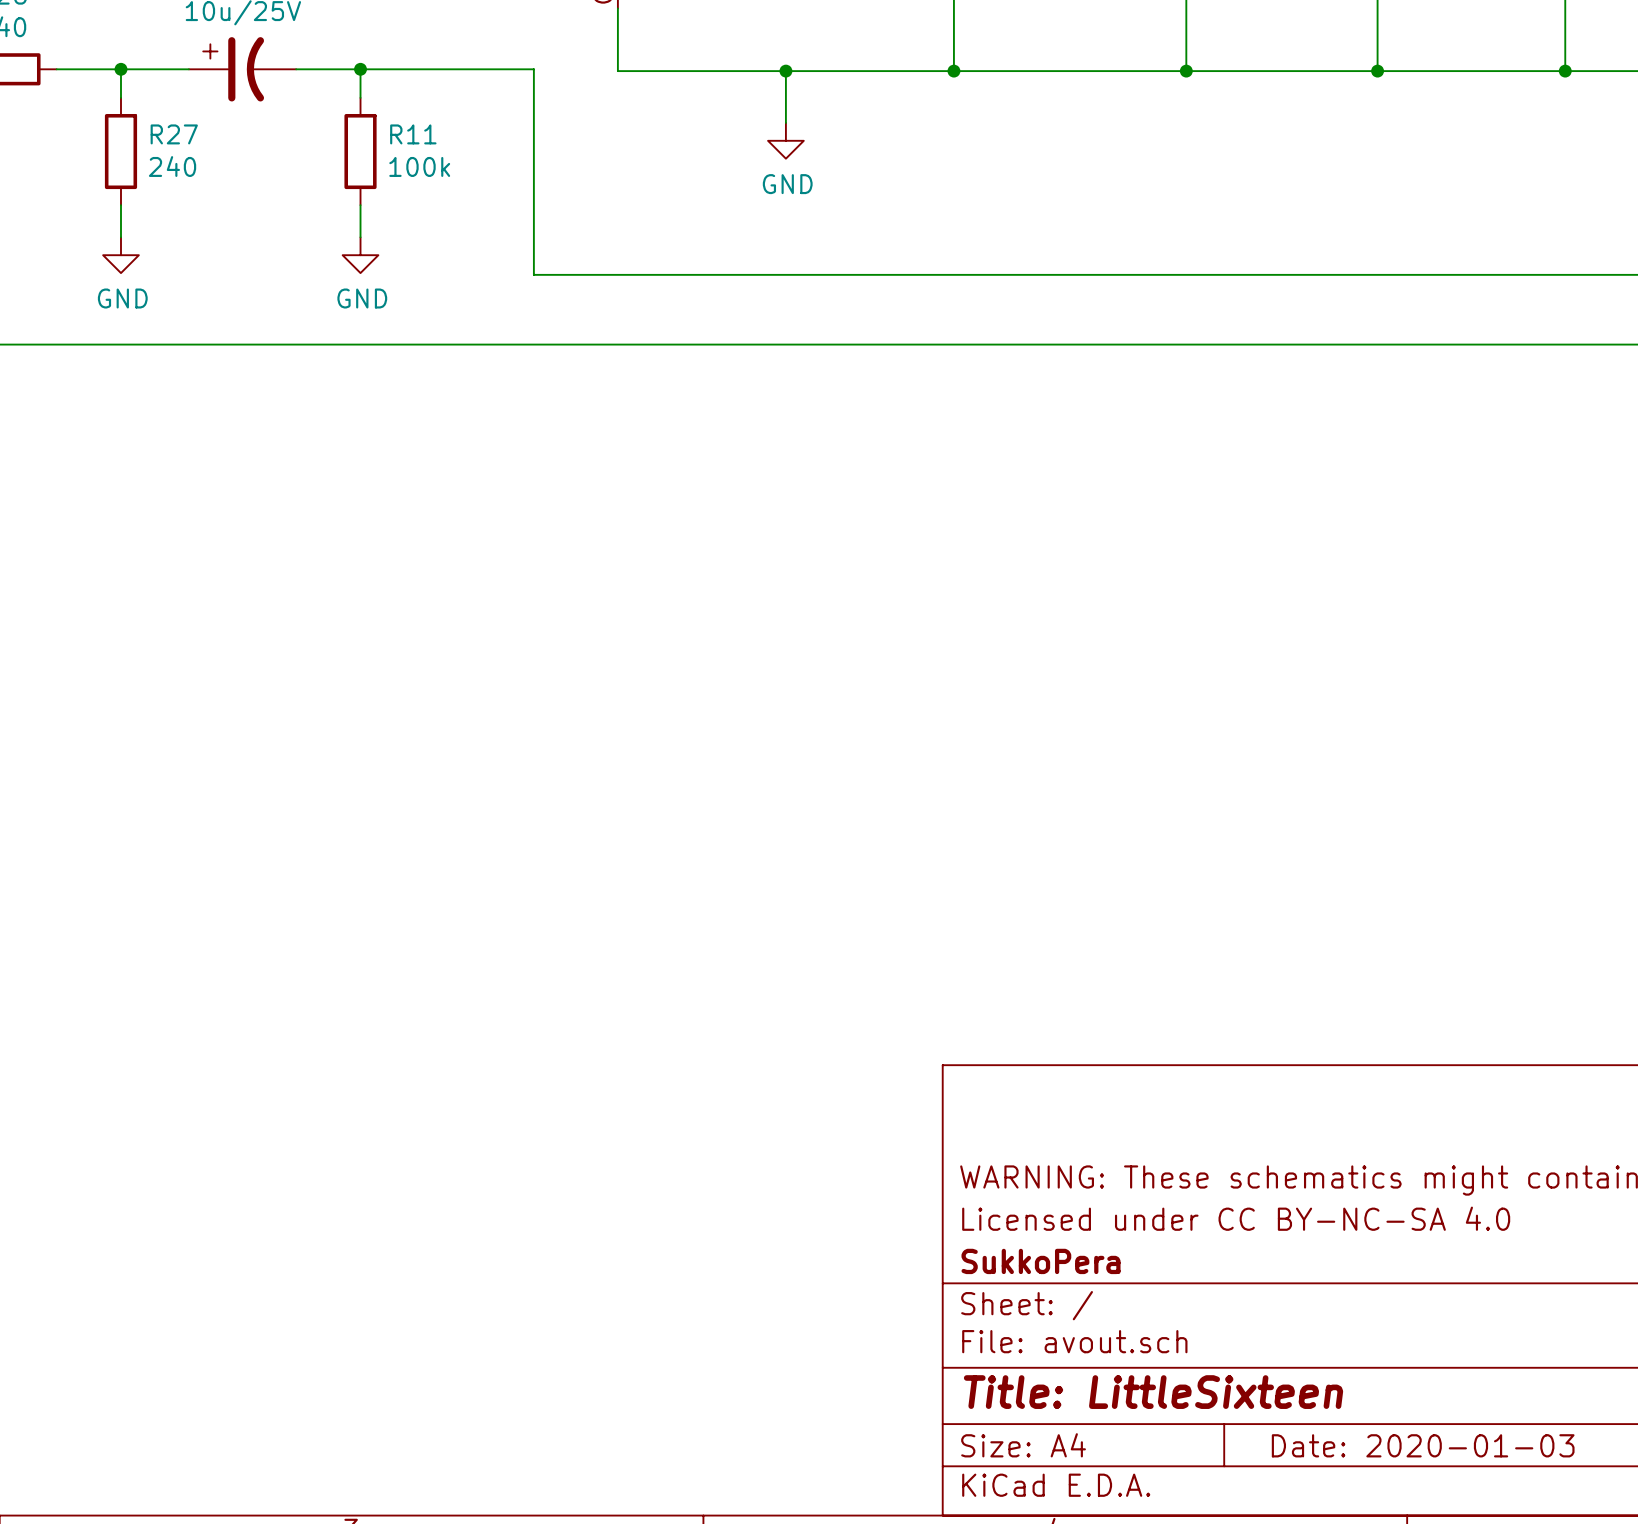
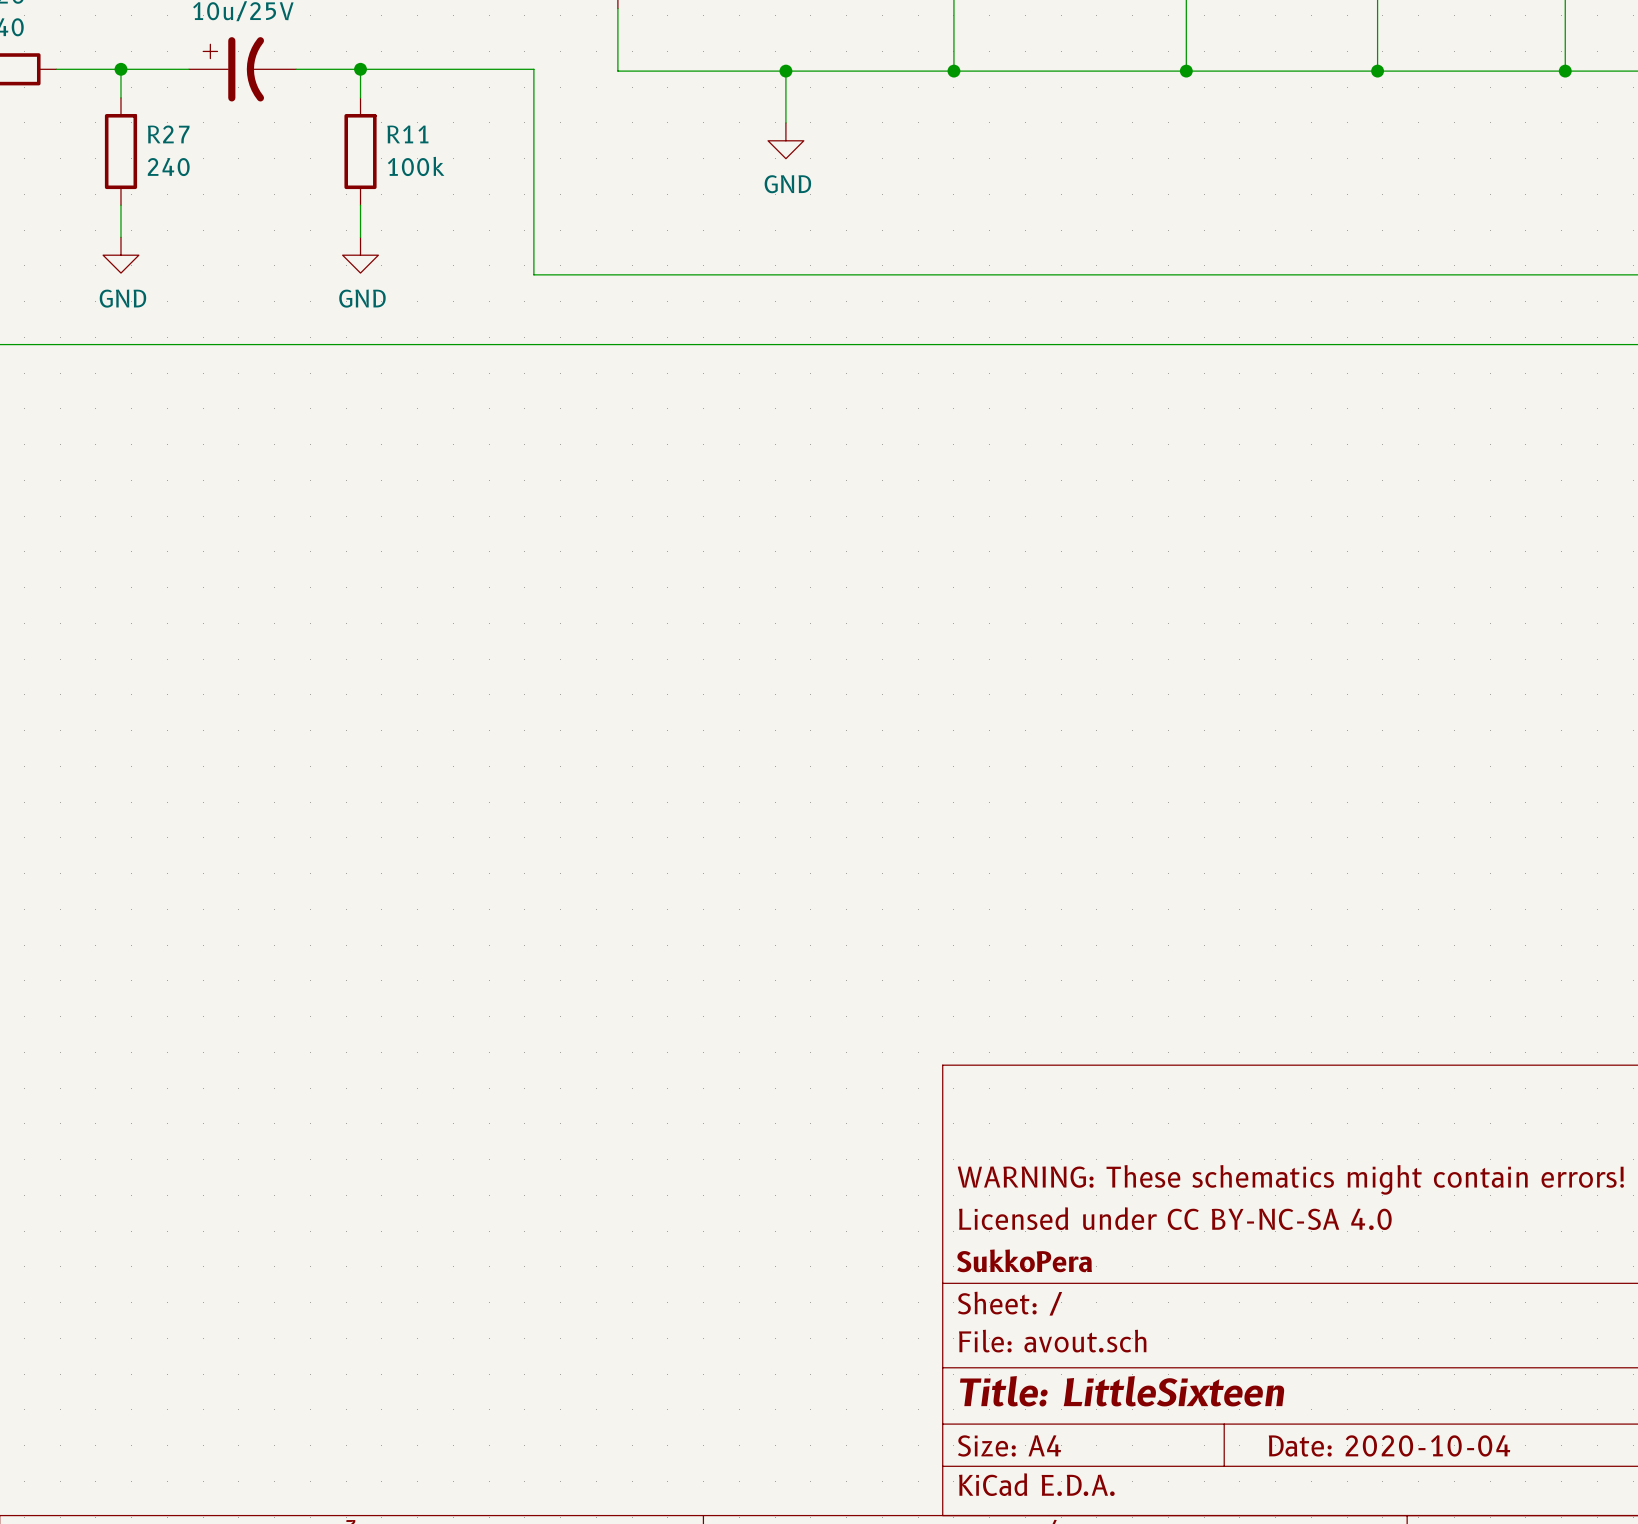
title block: Date: 2020-01-03 (1423, 1445) -> Date: 2020-10-04 (1389, 1445)

